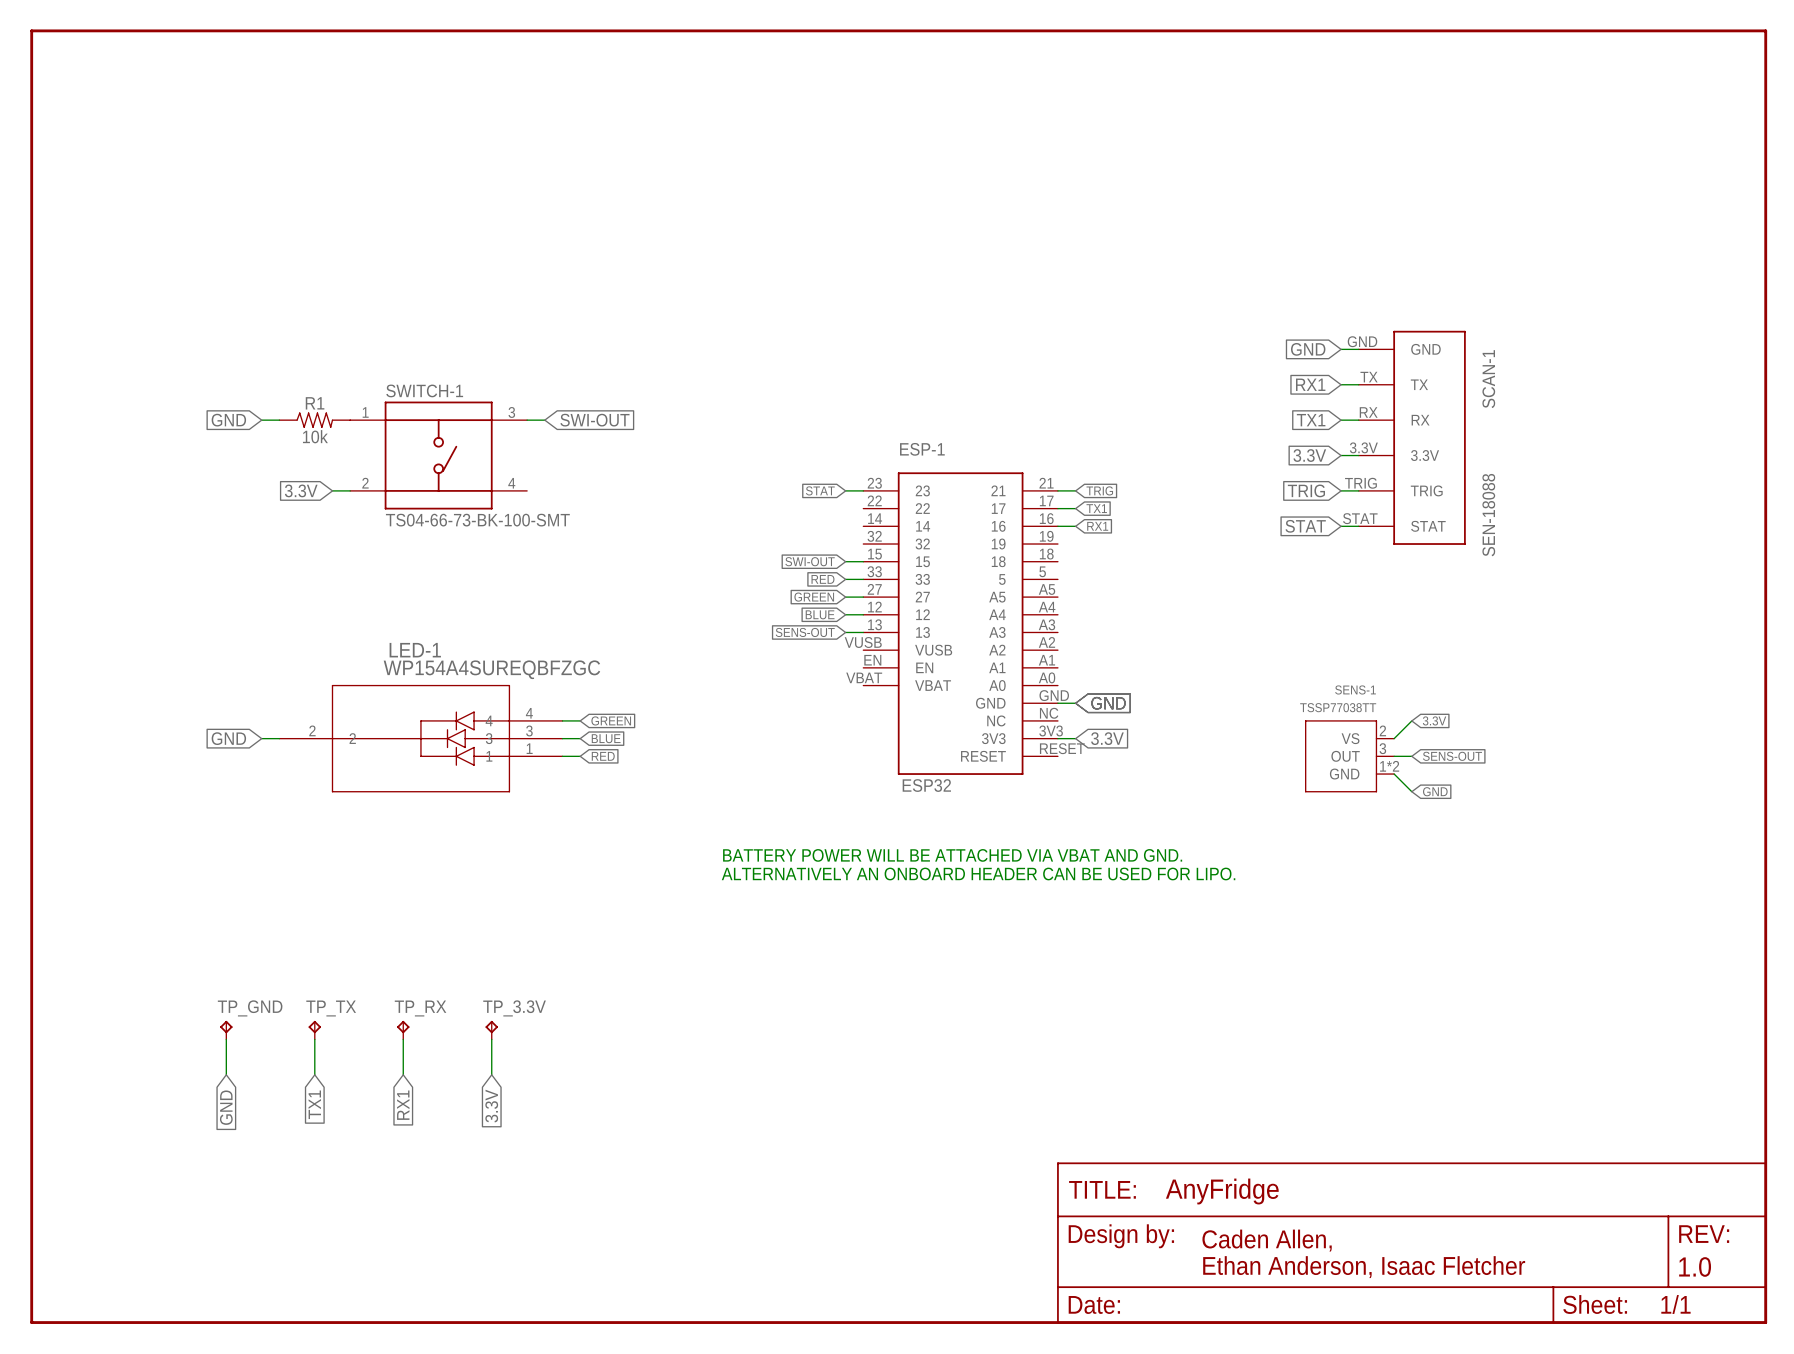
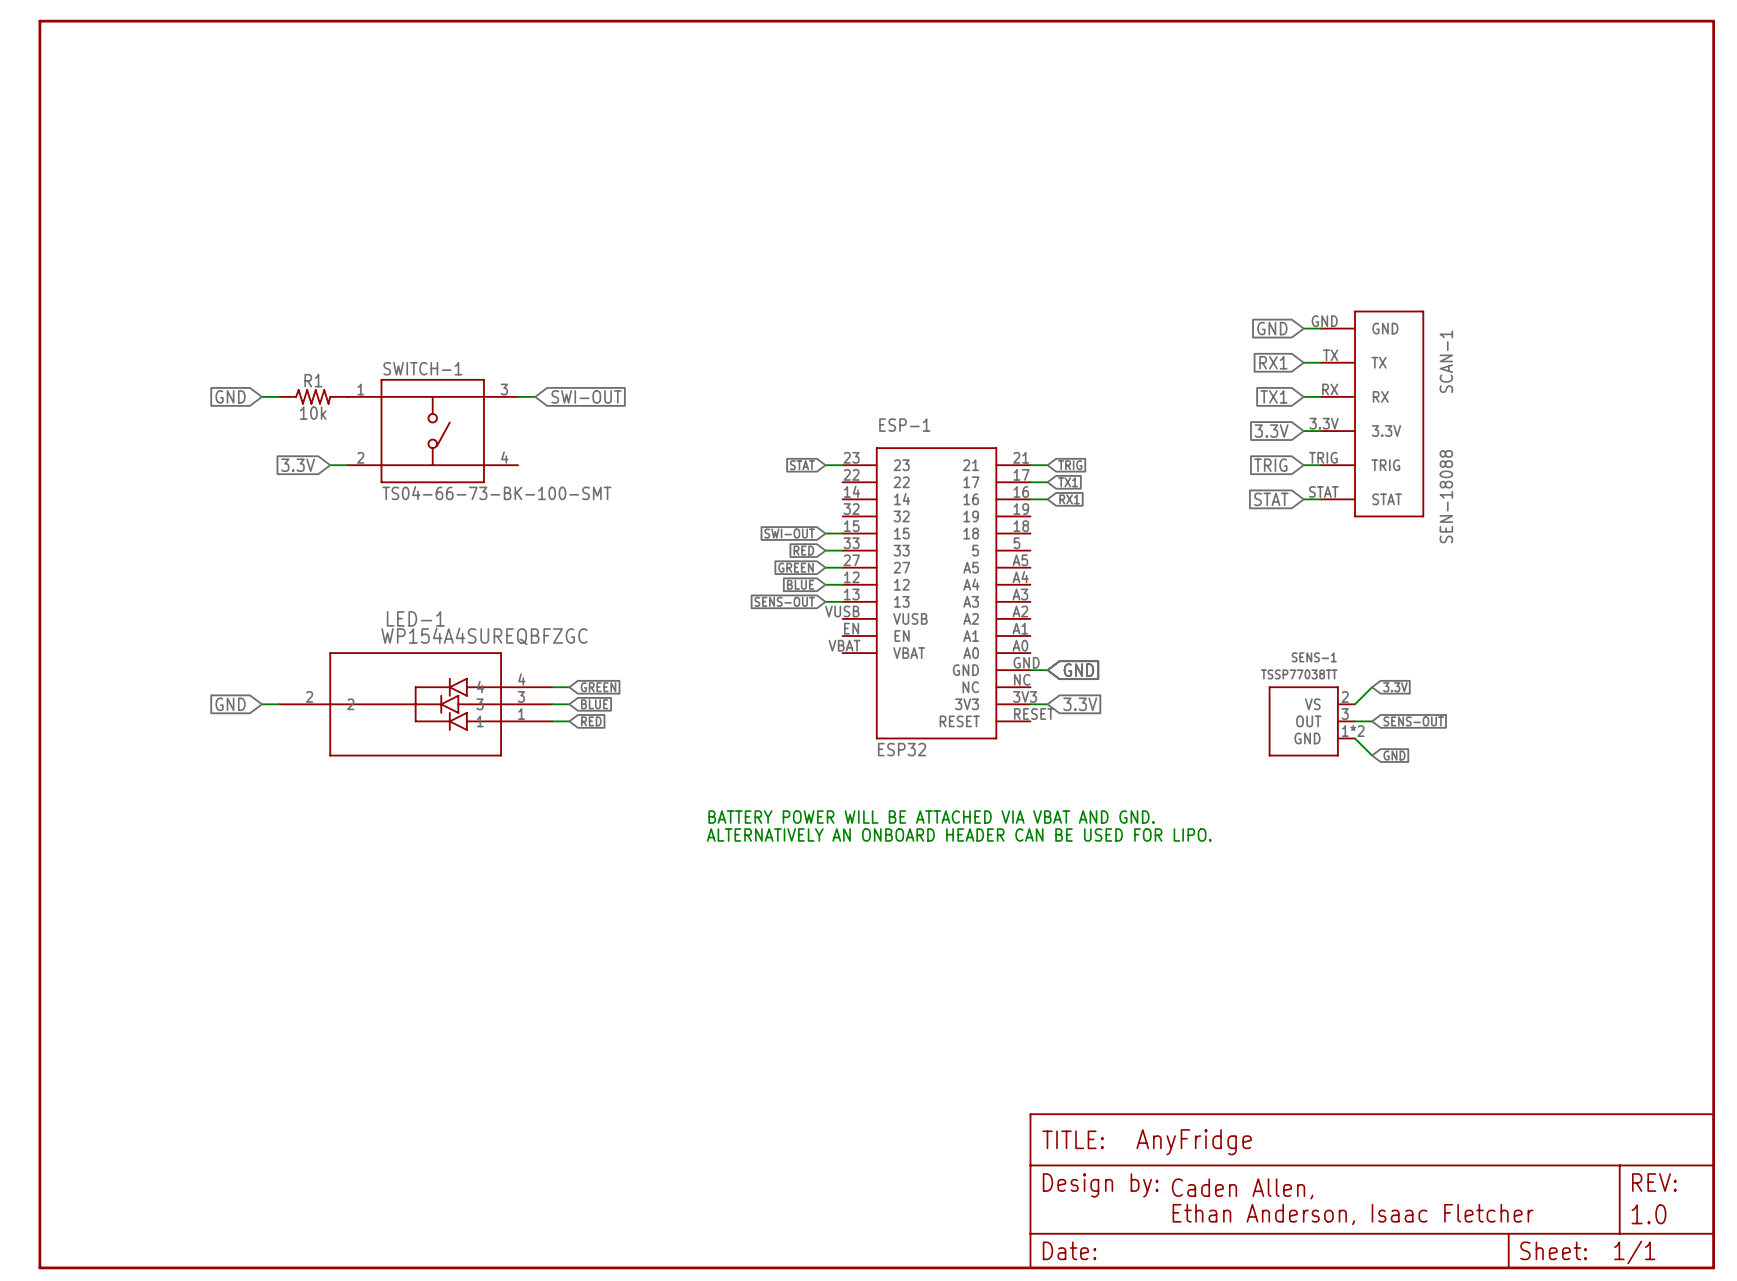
TP_GND: (226, 1030) -> none
TP_TX: (314, 1030) -> none
TP_RX: (403, 1030) -> none
TP_3.3V: (491, 1030) -> none
wire: (226, 1039) (226, 1074) -> none
wire: (314, 1039) (314, 1074) -> none
wire: (403, 1039) (403, 1074) -> none
wire: (491, 1039) (491, 1074) -> none
global label: TX1 (314, 1104) -> none
global label: RX1 (403, 1105) -> none
global label: 3.3V (491, 1106) -> none
global label: GND (226, 1107) -> none

